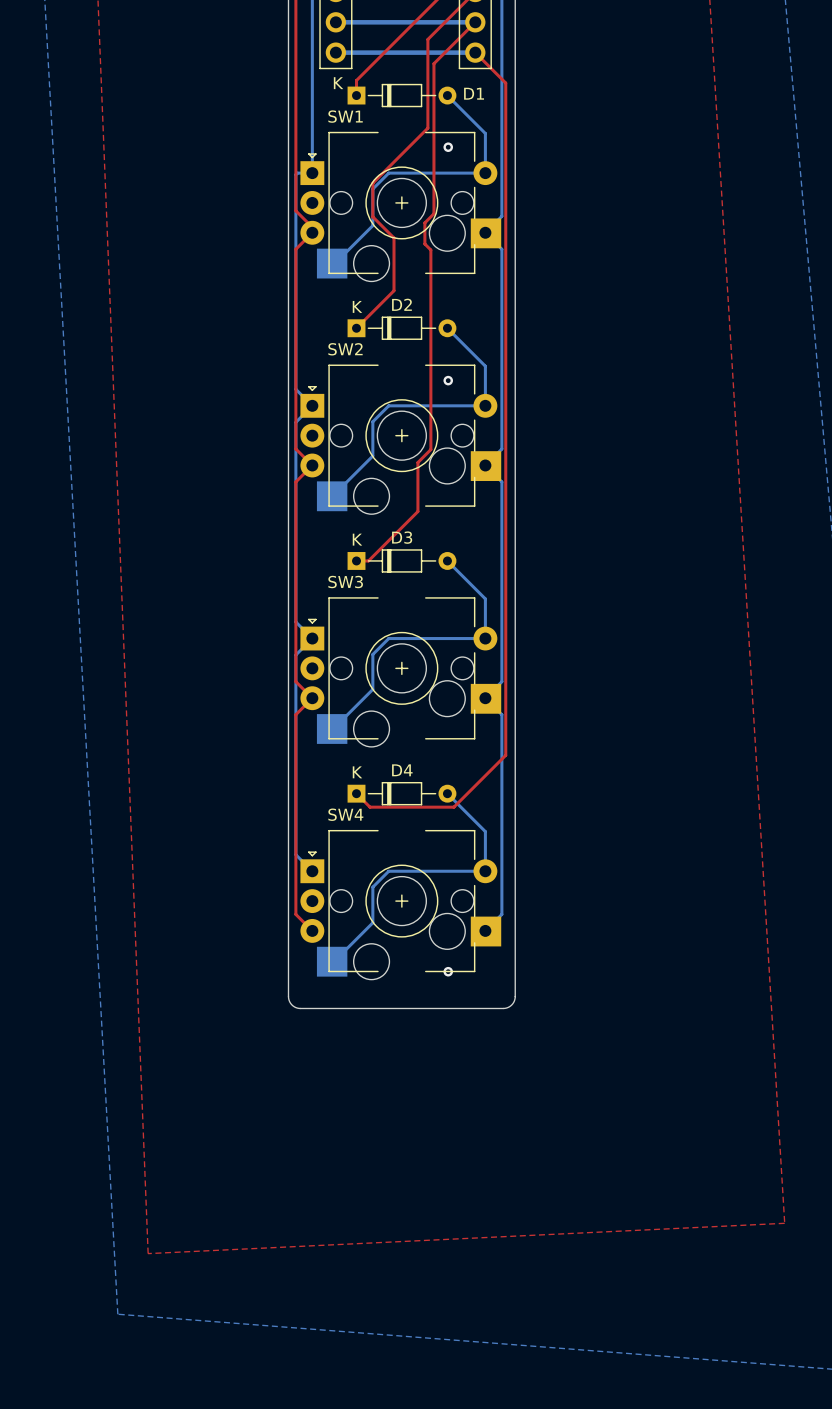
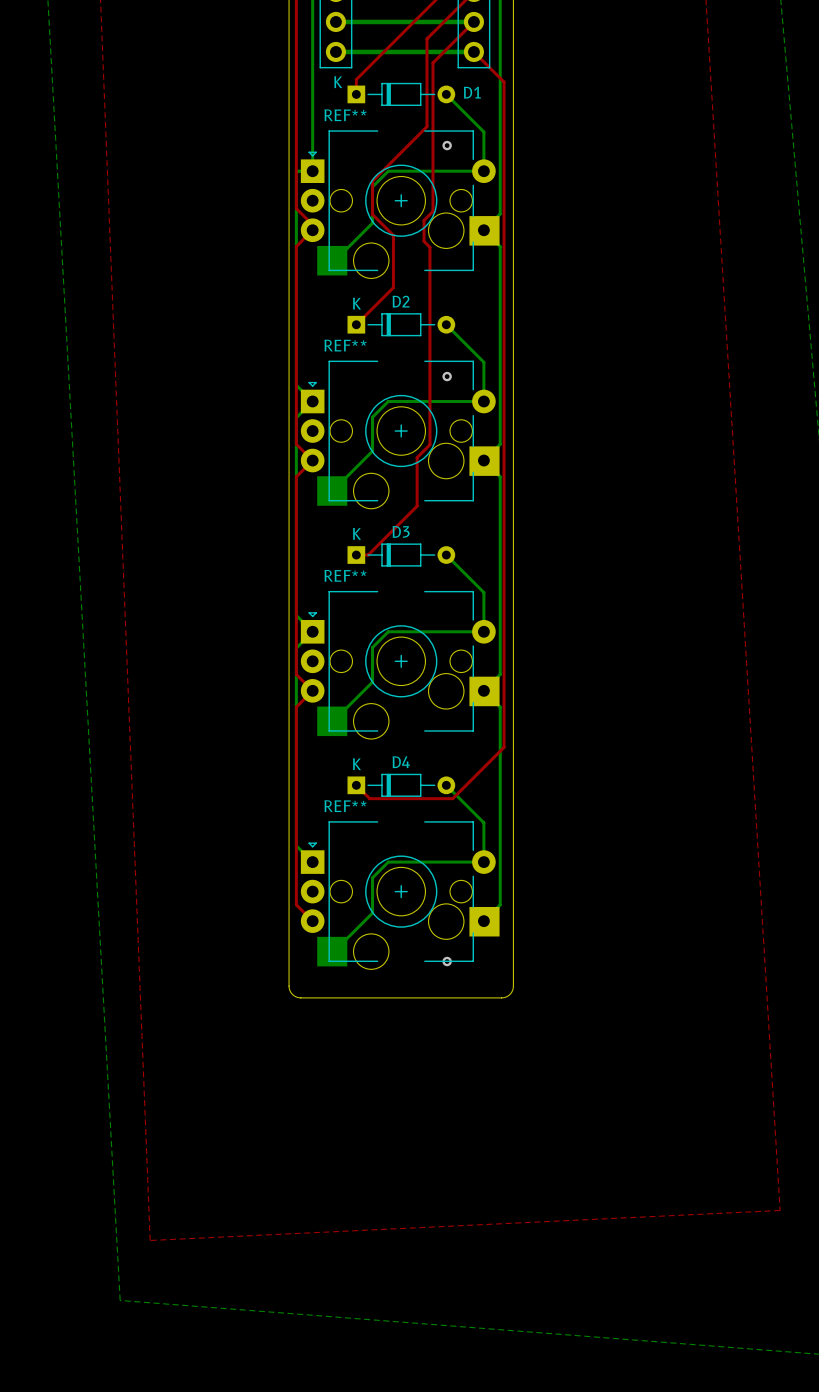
part text: SW1 (345, 116) -> REF** (345, 115)
part text: SW2 (345, 349) -> REF** (345, 345)
part text: SW3 (345, 582) -> REF** (345, 575)
part text: SW4 (345, 814) -> REF** (345, 806)

